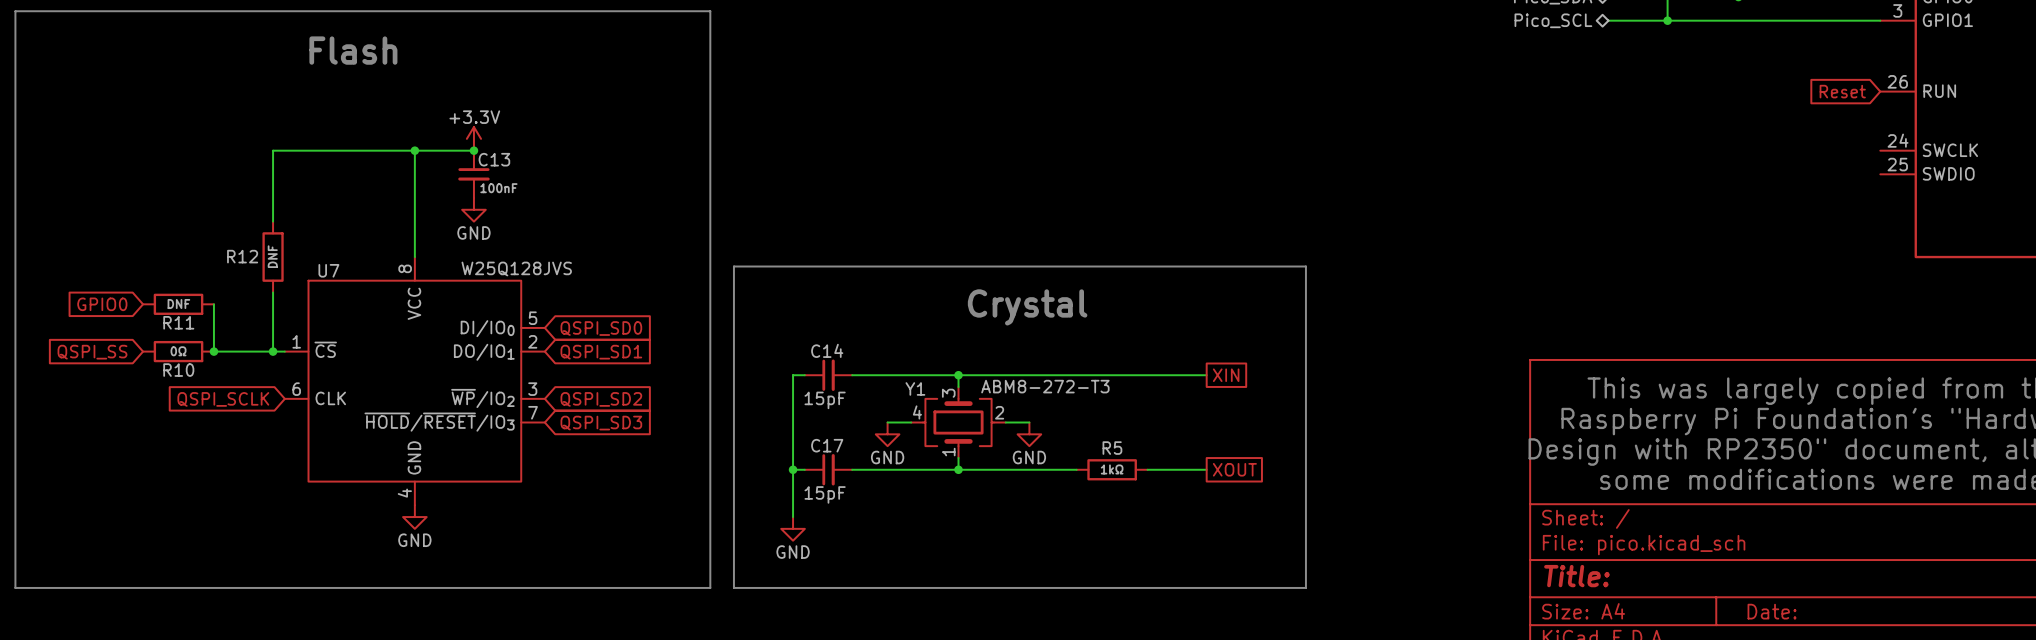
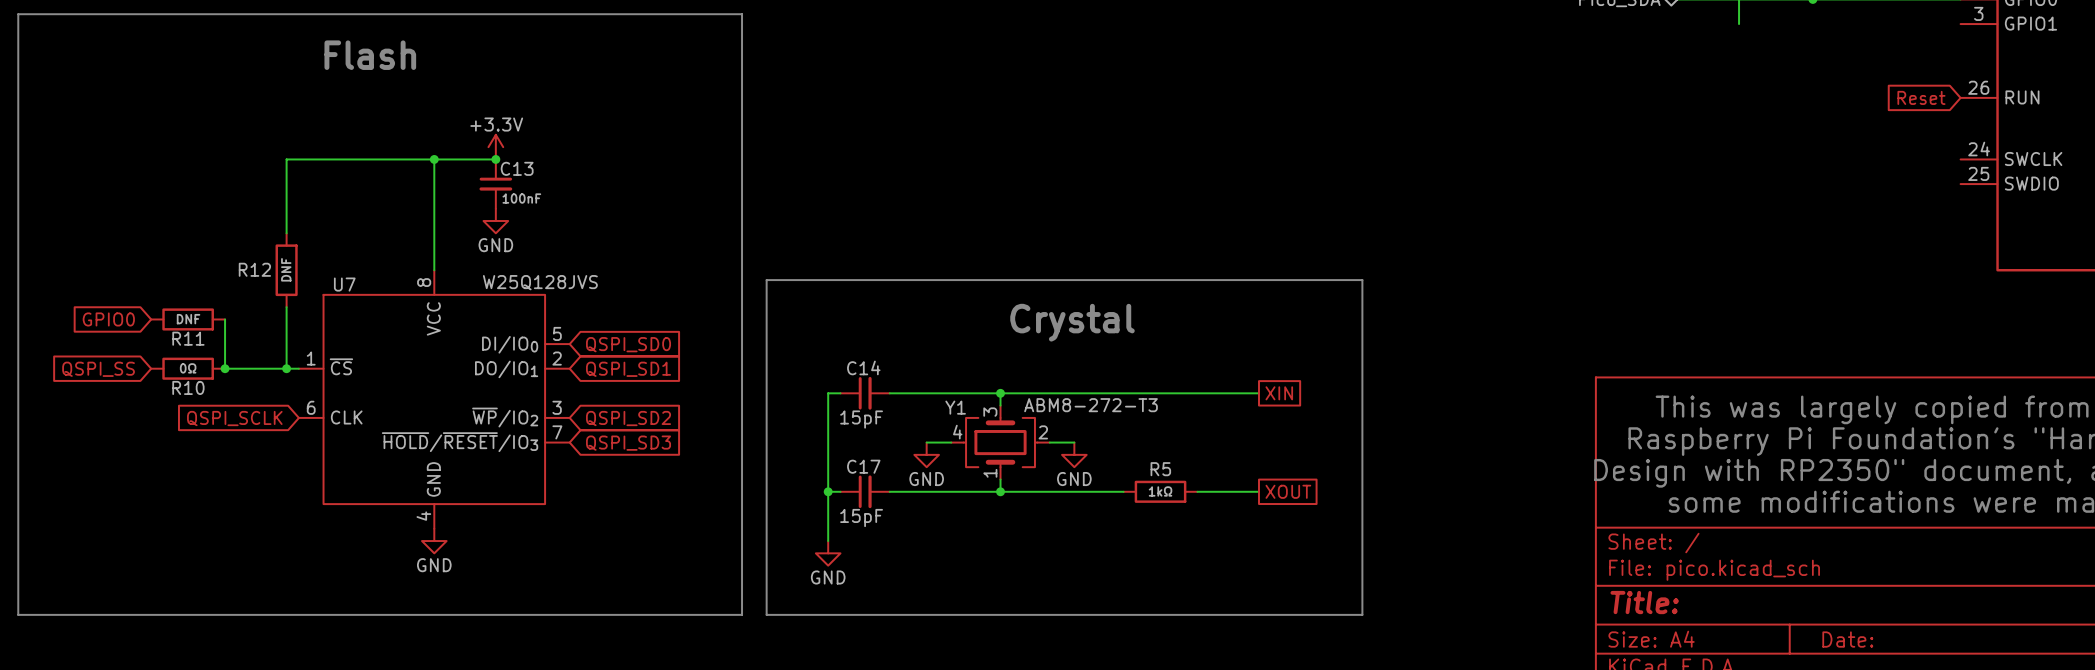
hierarchical label: Pico_SCL (1553, 20) -> none
wire: (1608, 20) (1880, 20) -> none
junction: (1667, 20) -> none

